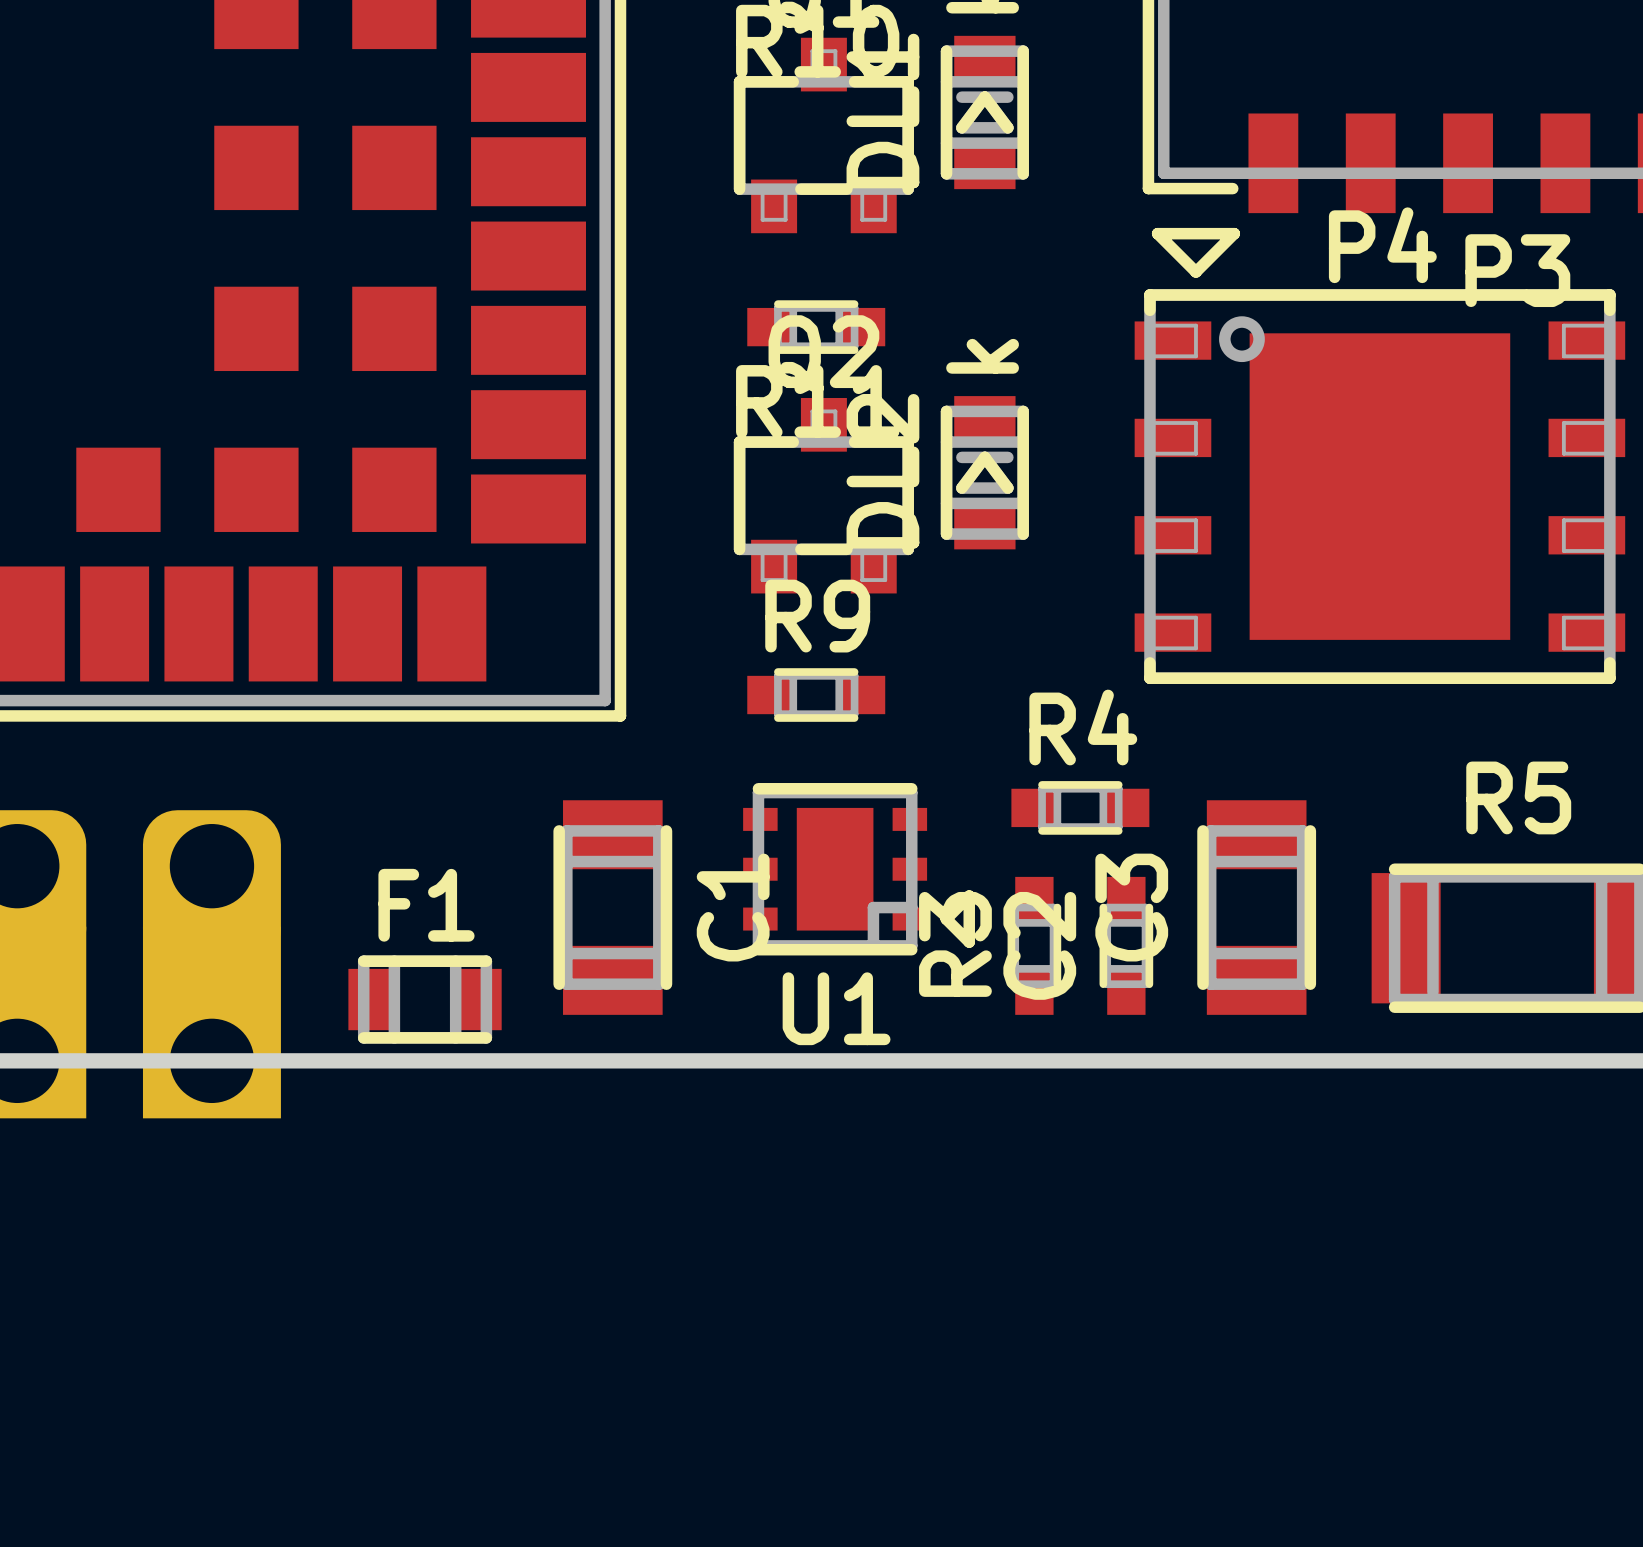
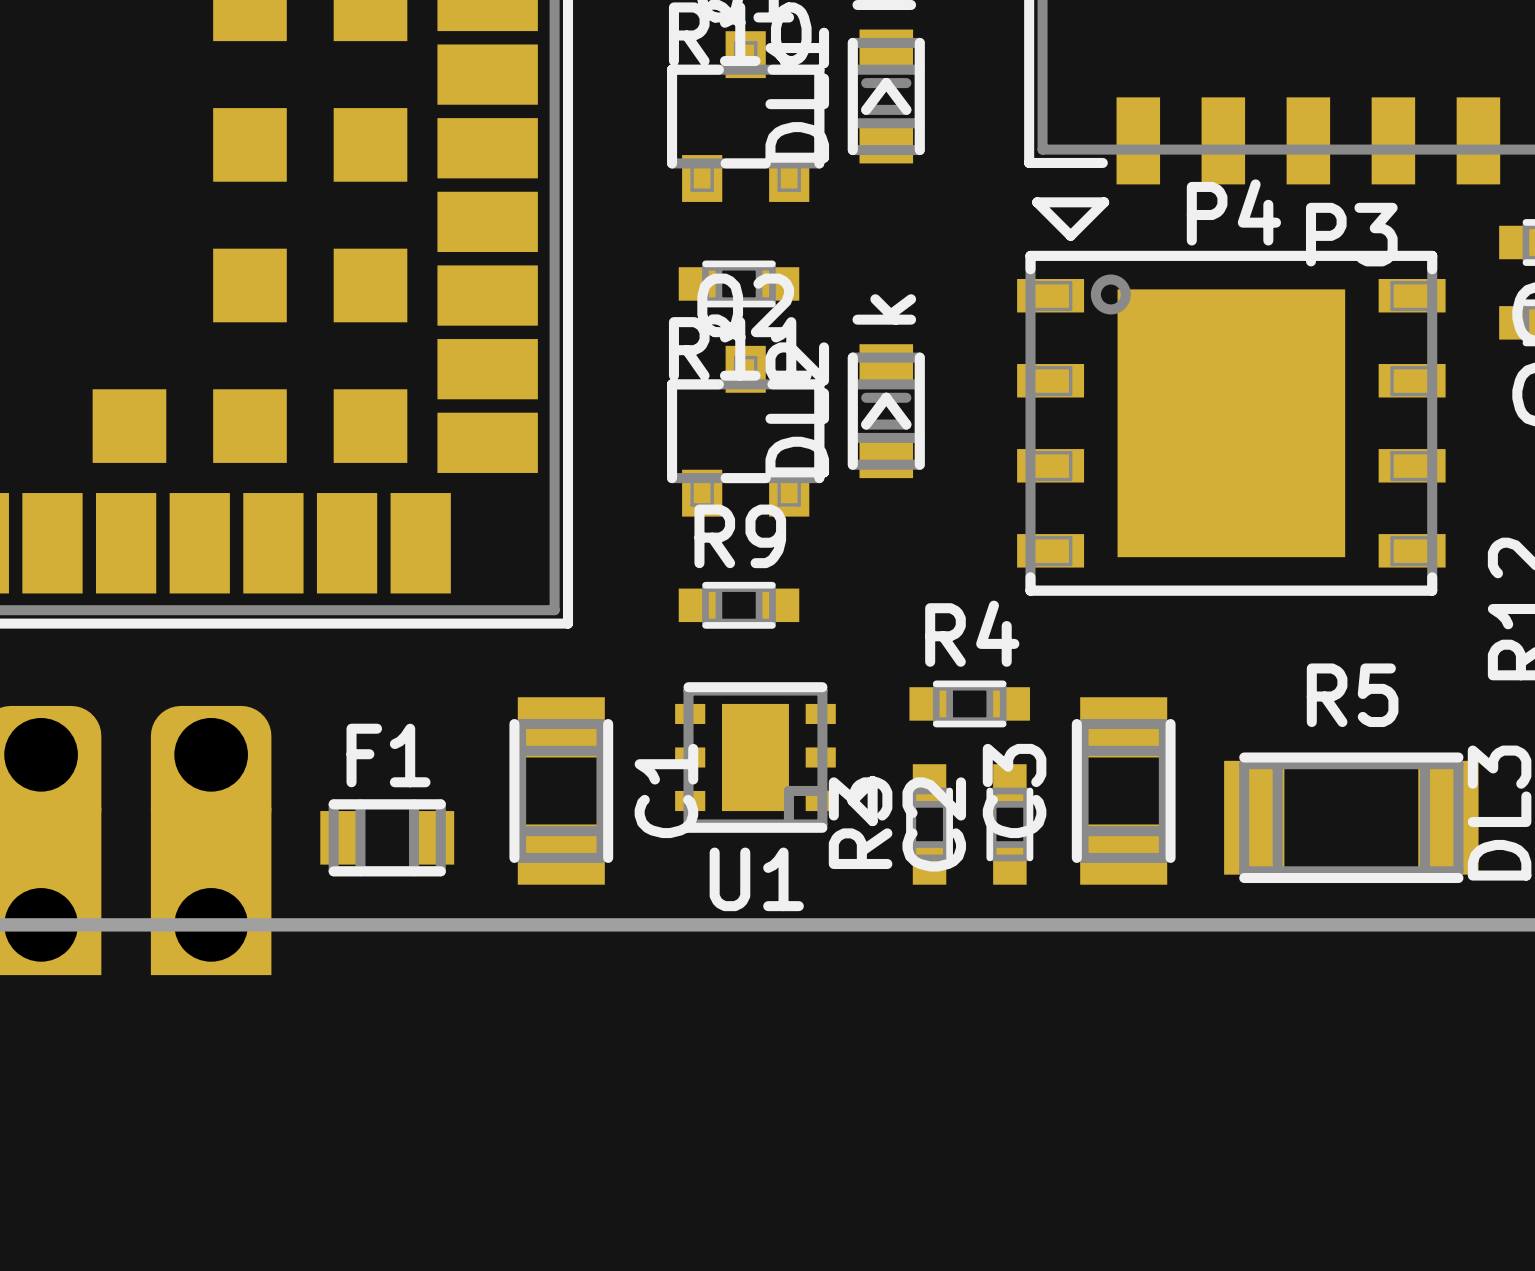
F1 position: (425, 999) -> (387, 837)

